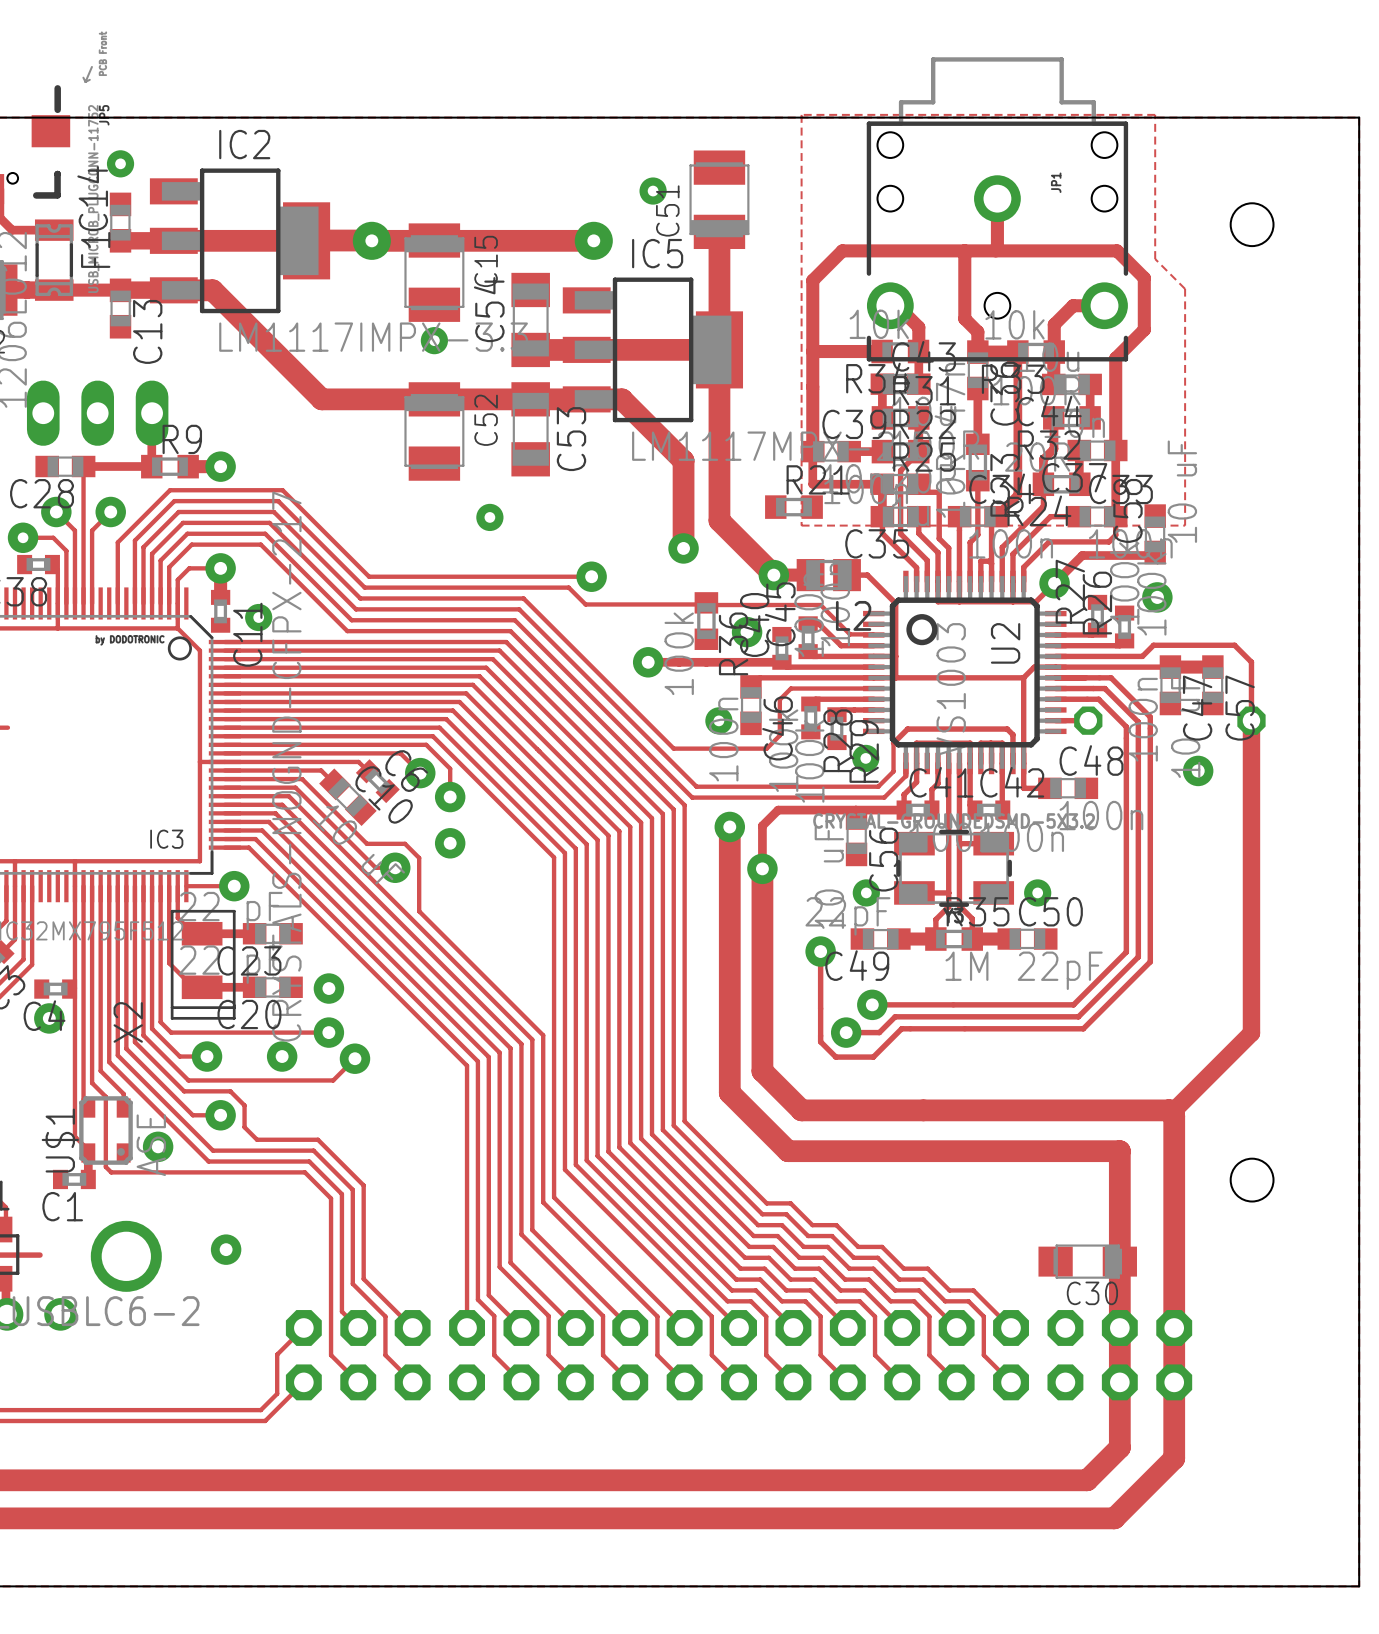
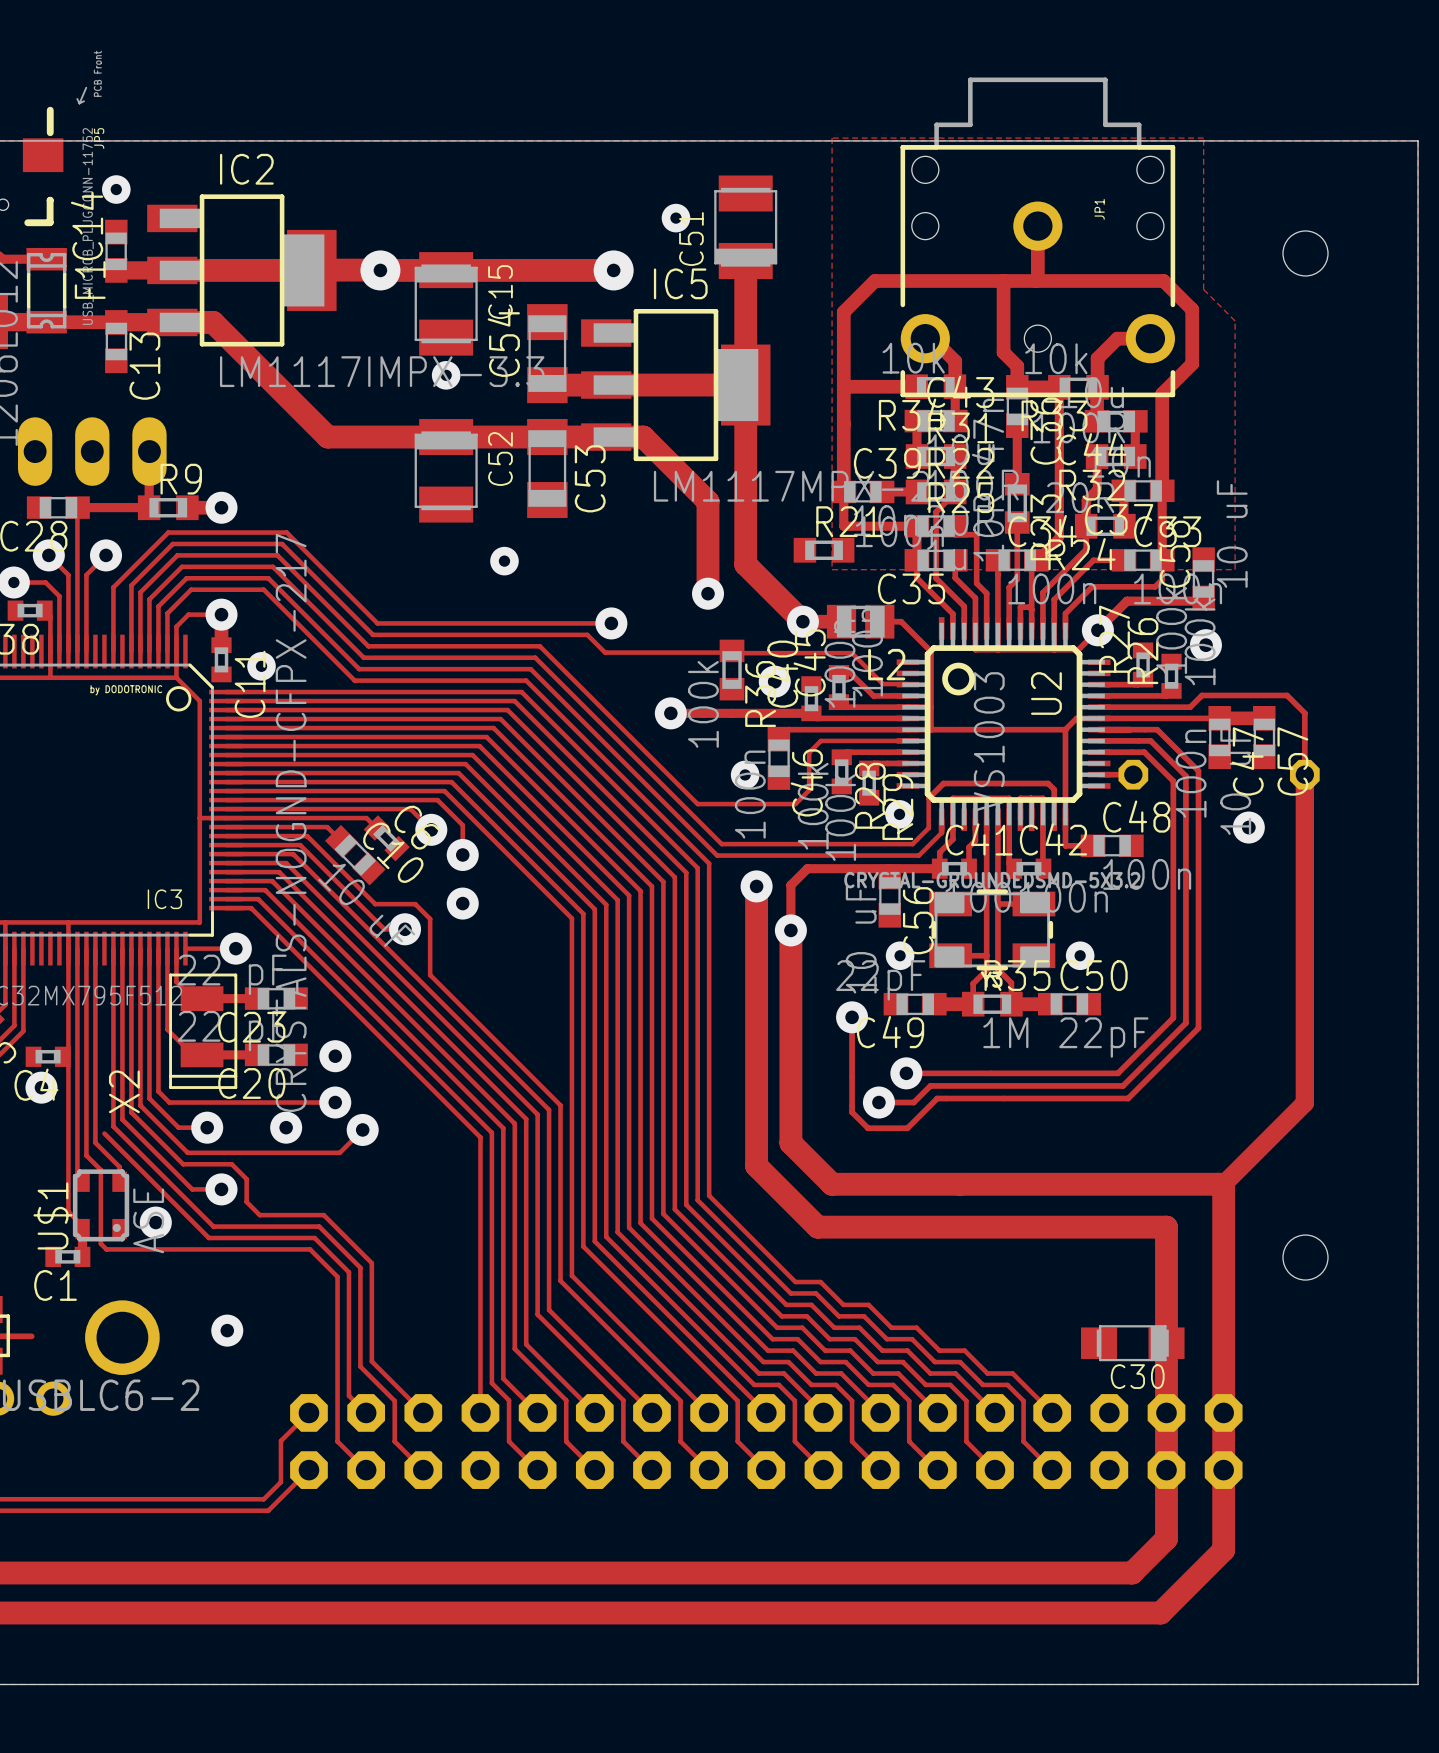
track: (109, 886) (109, 1062) -> none

